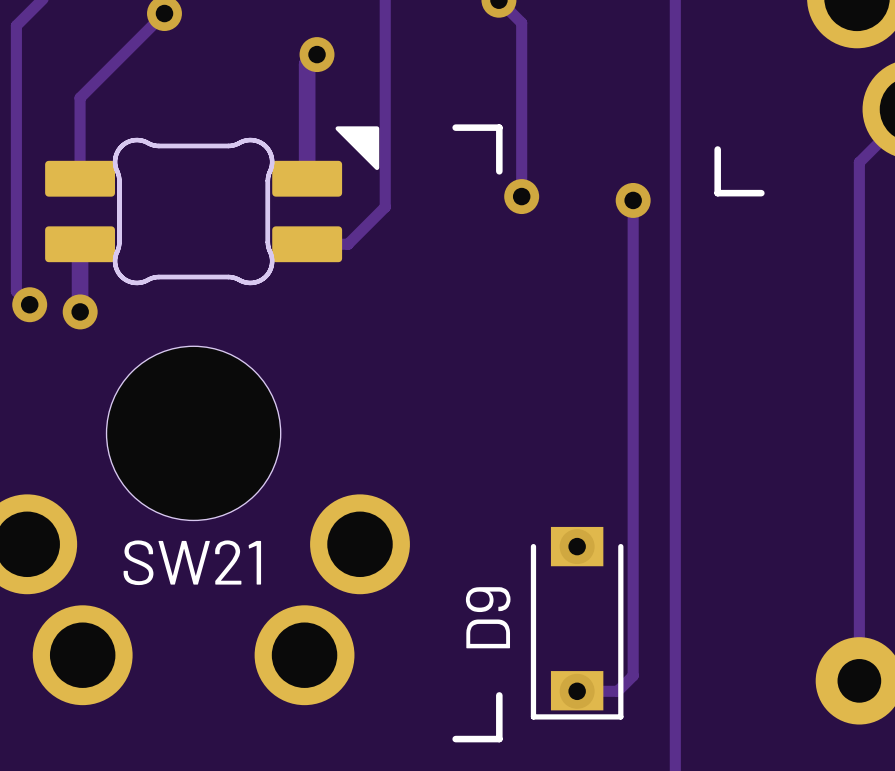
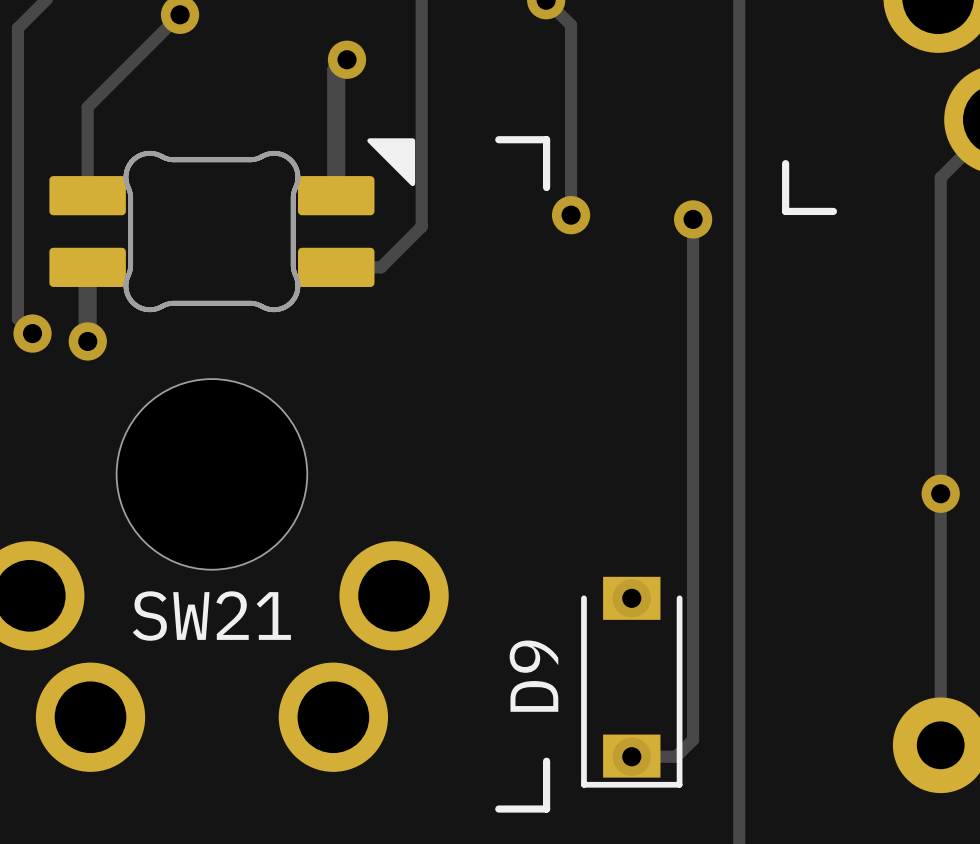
via: none -> (940, 493)

